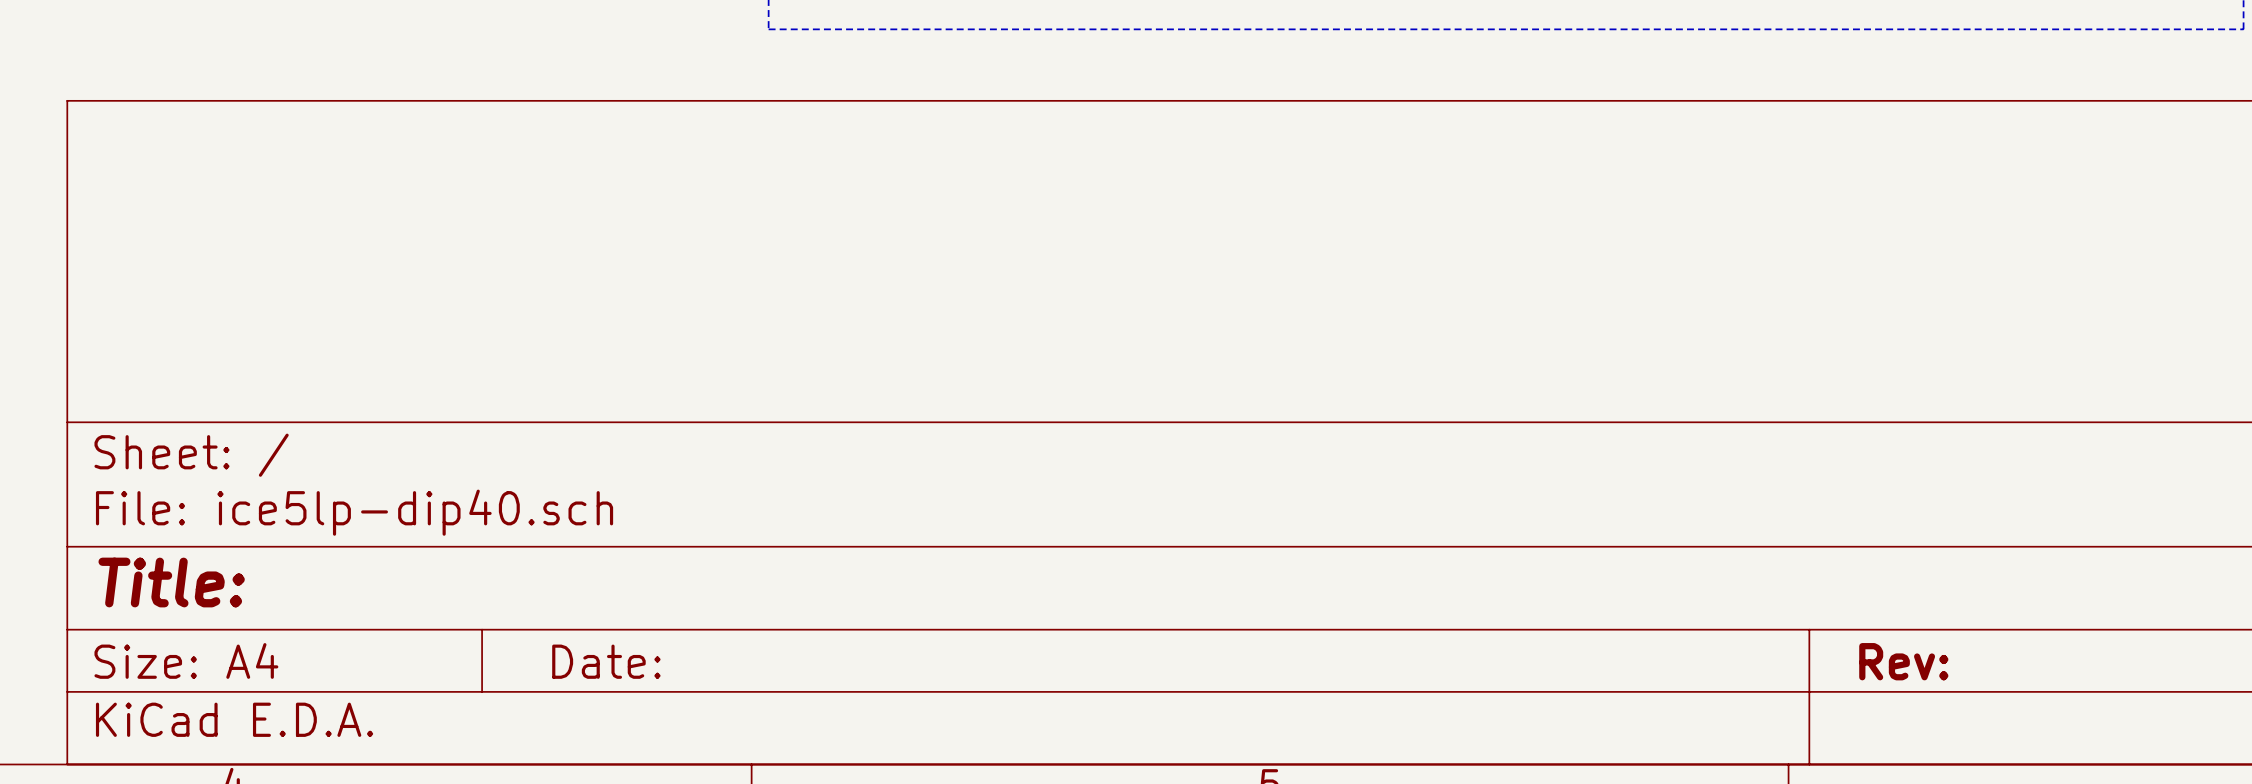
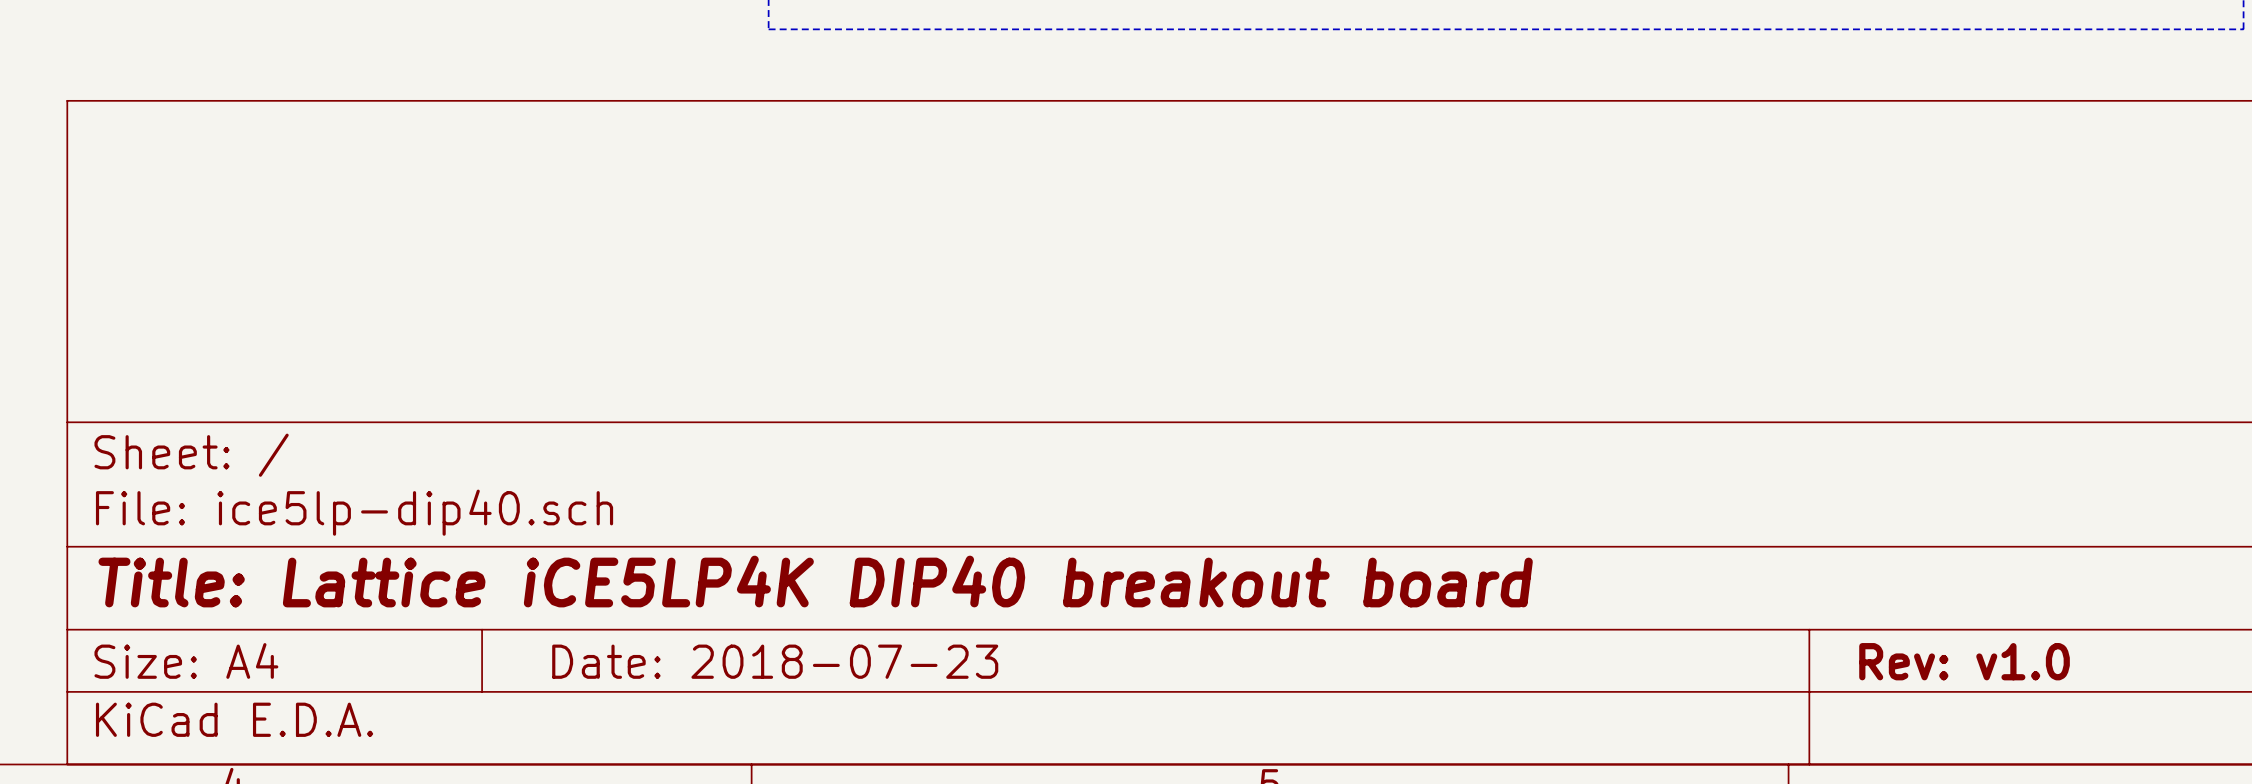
title block: Title: (171, 582) -> Title: Lattice iCE5LP4K DIP40 breakout board (815, 581)
title block: Date: (606, 661) -> Date: 2018-07-23 (775, 661)
title block: Rev: (1903, 661) -> Rev: v1.0 (1964, 661)

